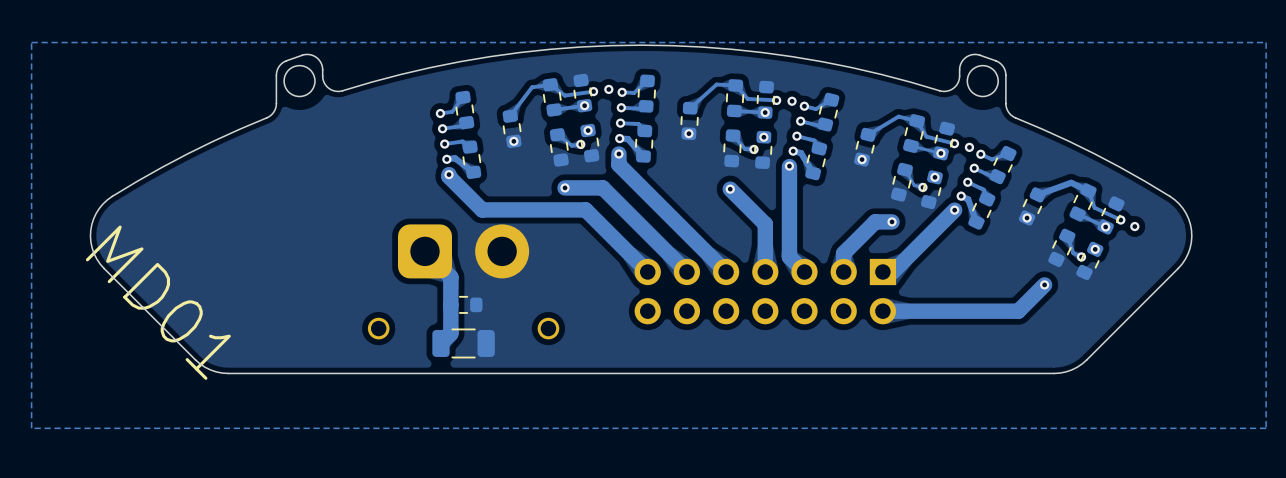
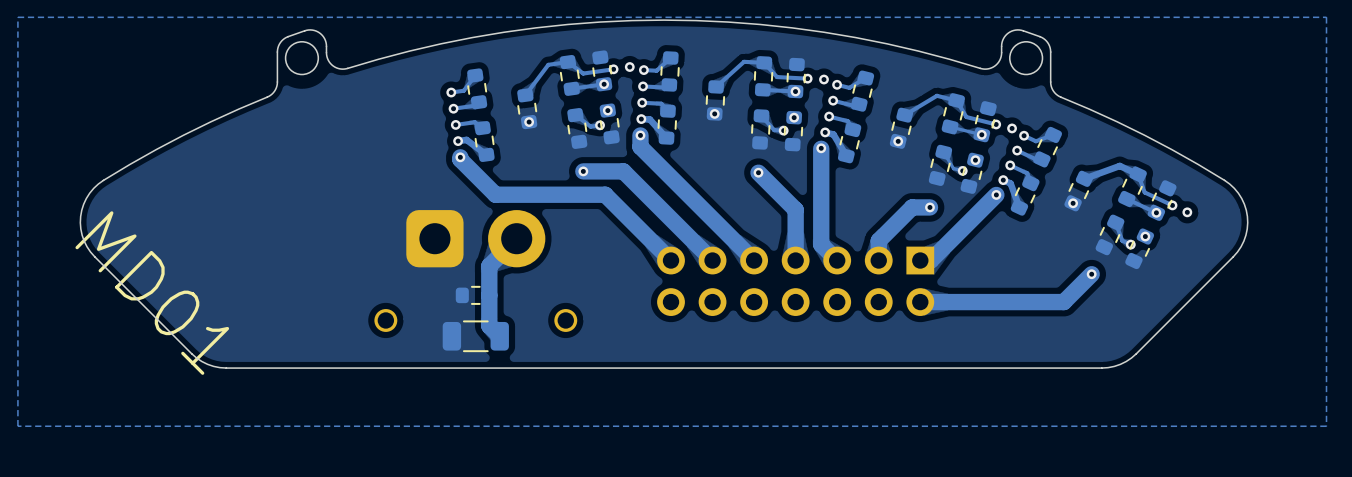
track: (424, 251) (450, 277) (450, 333) (441, 343) -> none
track: none -> (516, 238) (489, 266) (489, 325) (499, 336)

